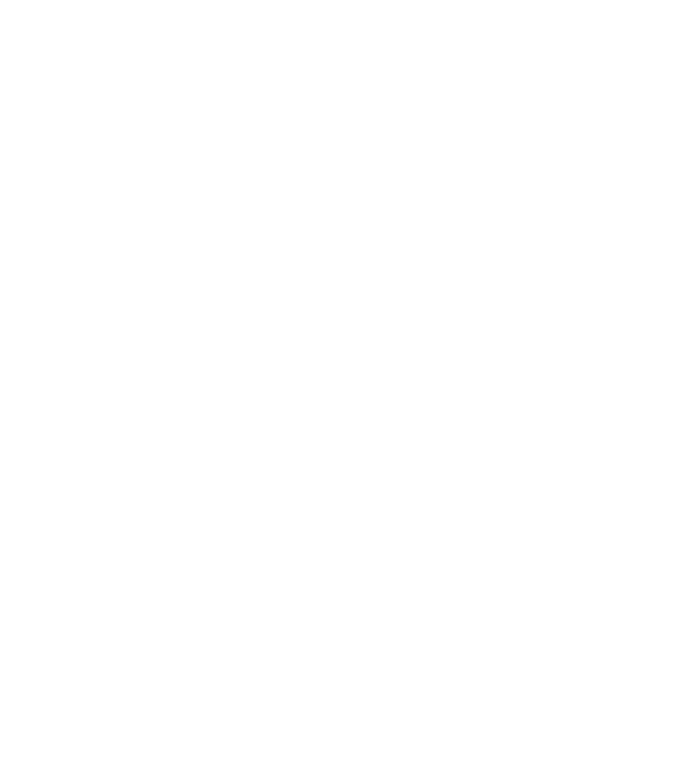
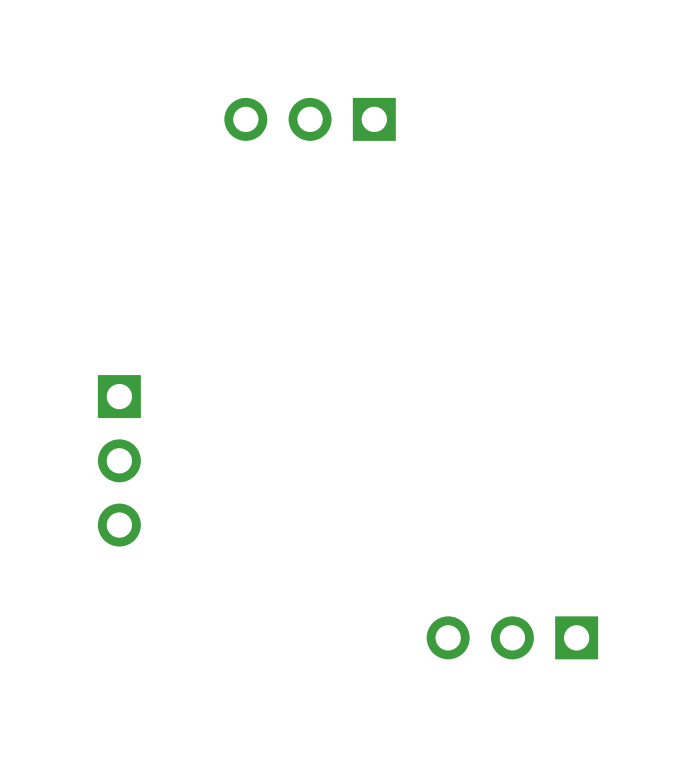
part: none -> (310, 119)
part: none -> (119, 460)
part: none -> (512, 637)

